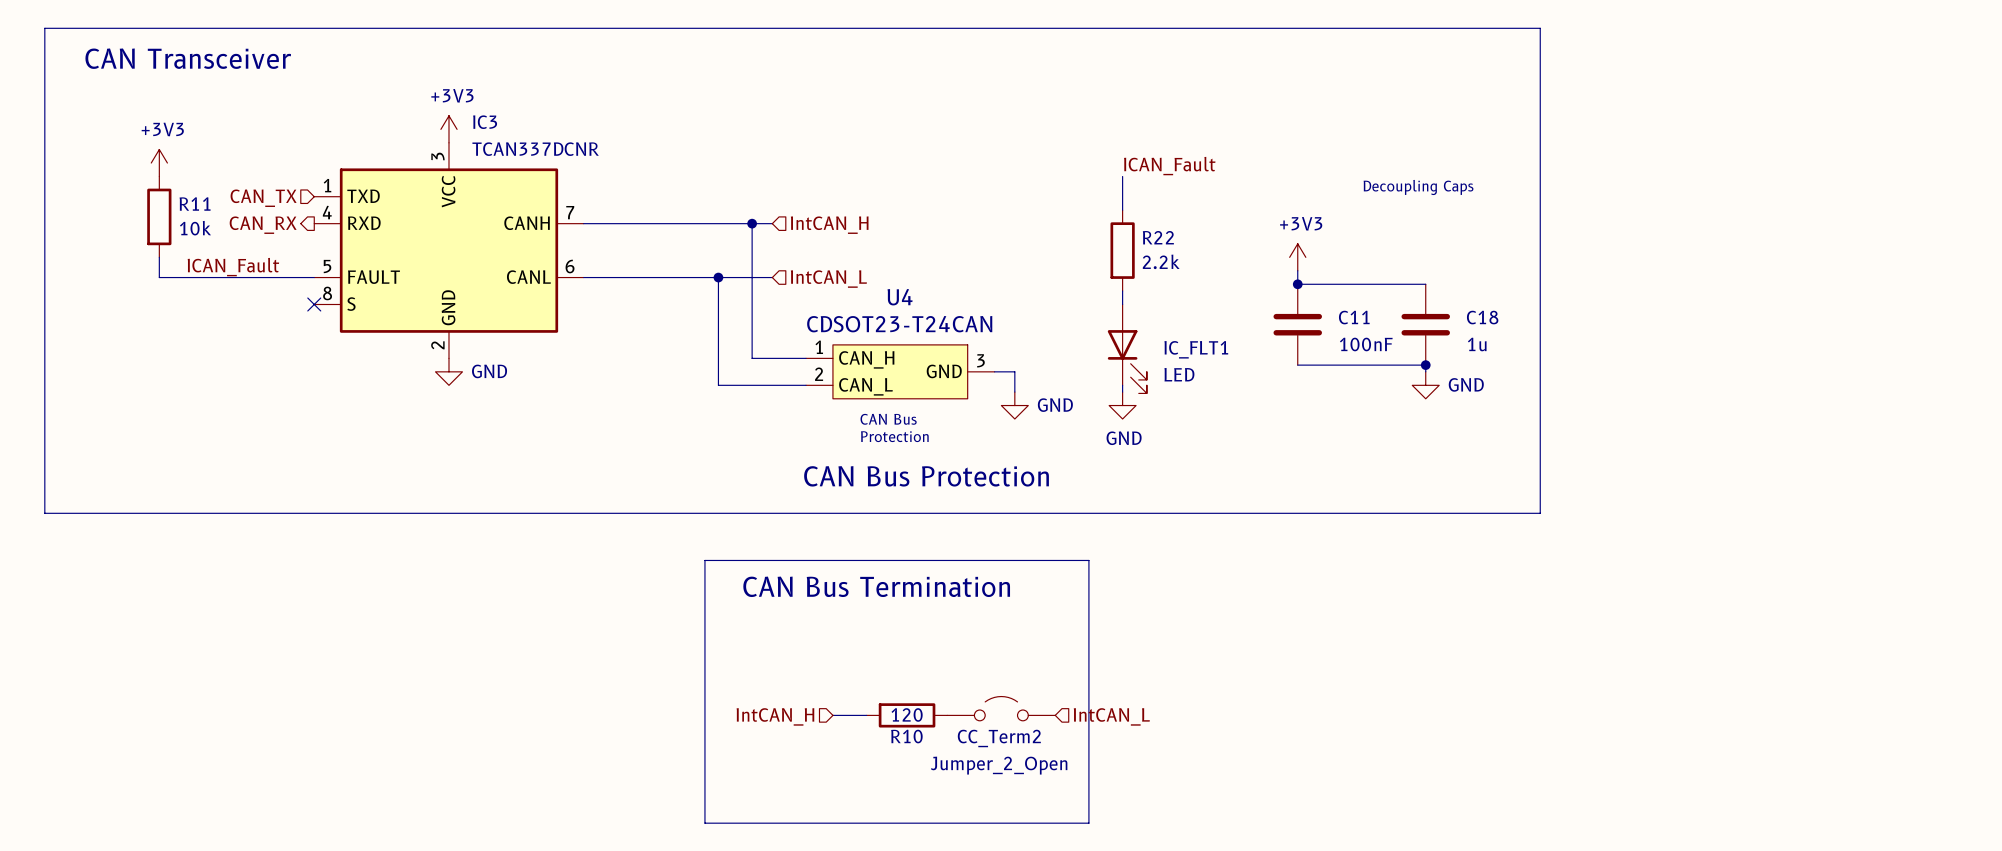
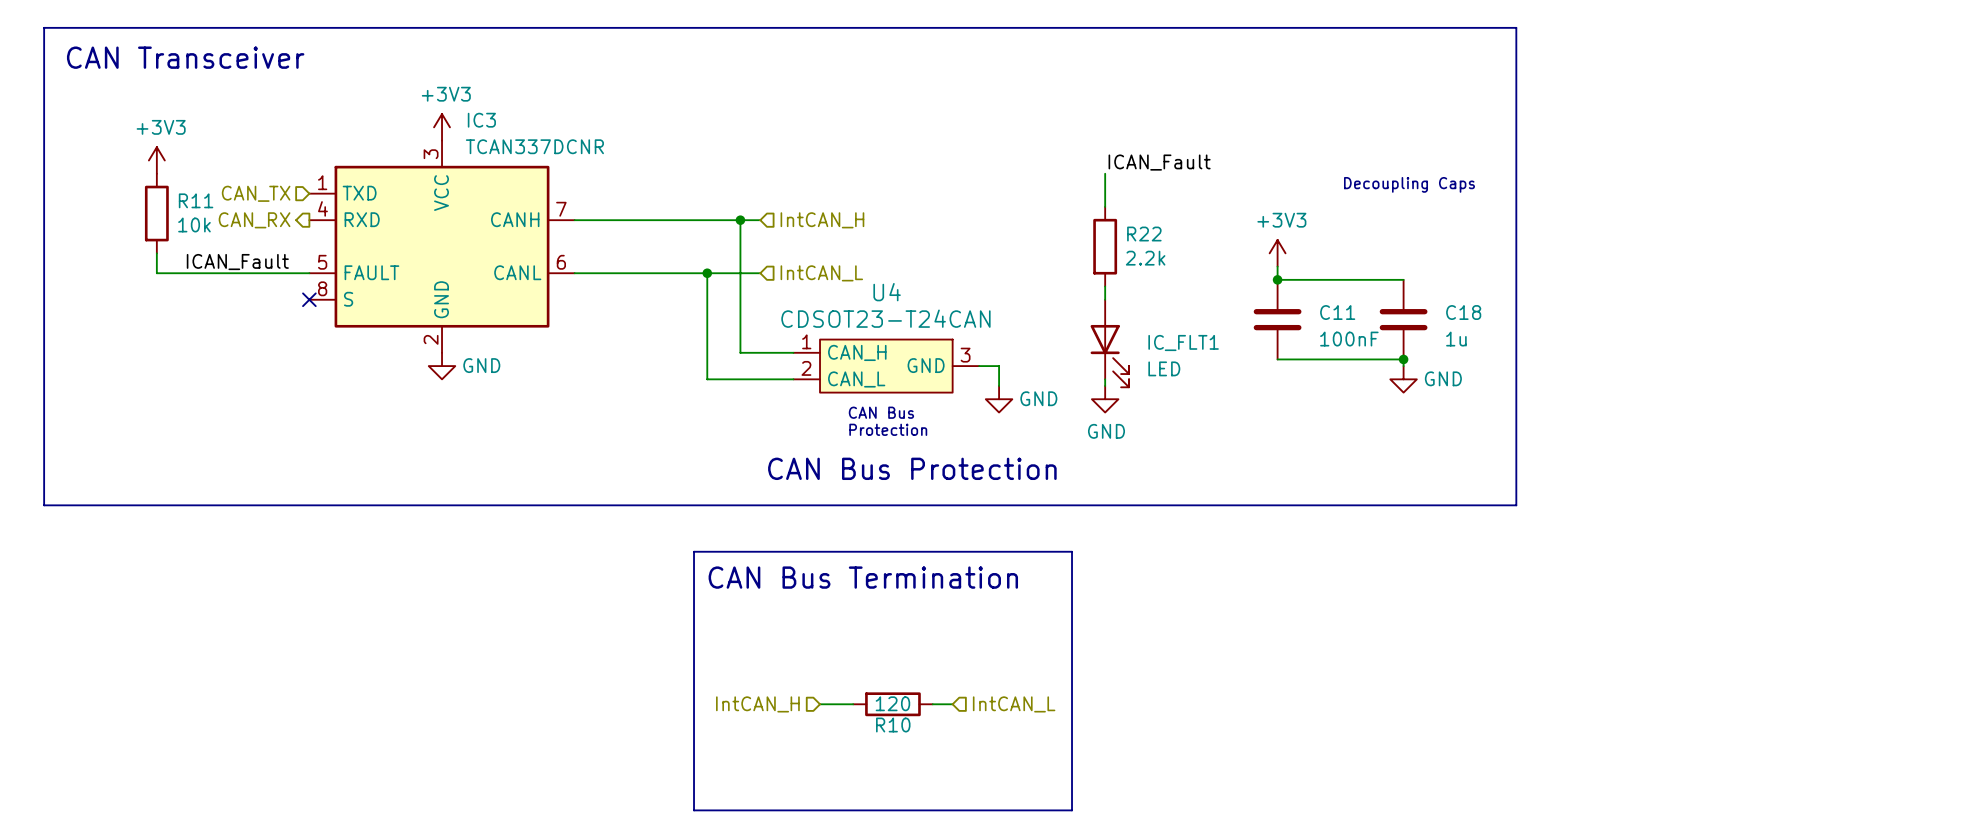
CC_Term2: Jumper_2_Open (1001, 708) -> none
hierarchical label position: IntCAN_L (1111, 716) -> IntCAN_L (1014, 704)

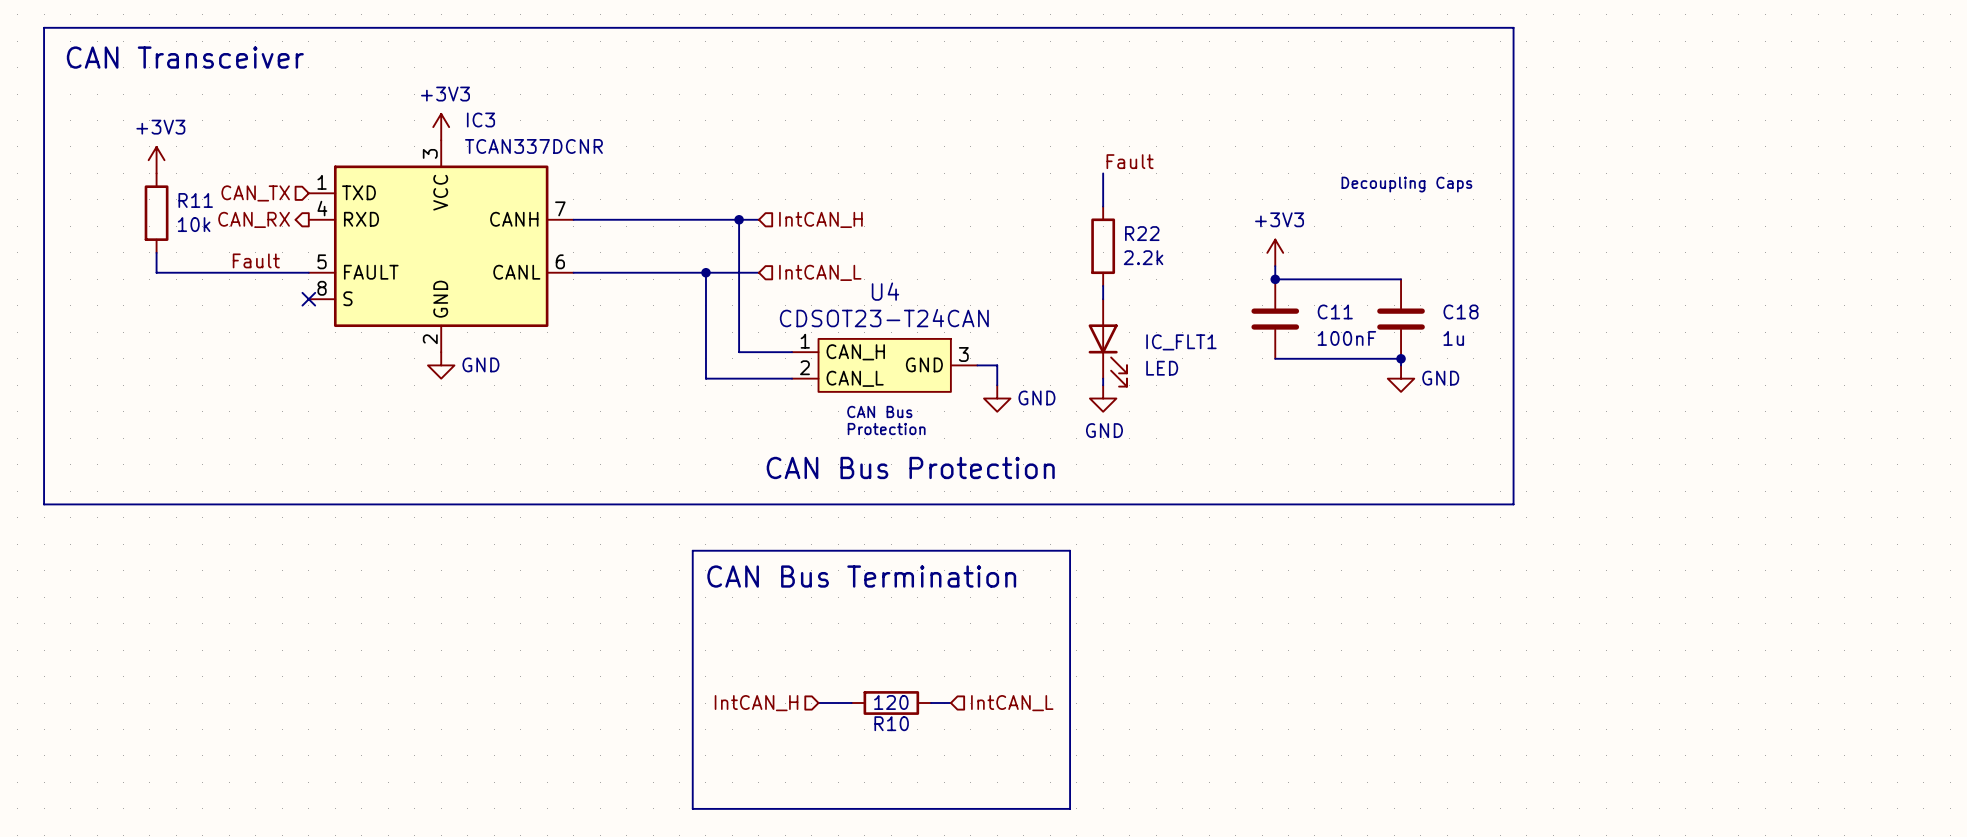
label: ICAN_Fault (1159, 162) -> Fault (1130, 161)
label: ICAN_Fault (237, 262) -> Fault (256, 260)

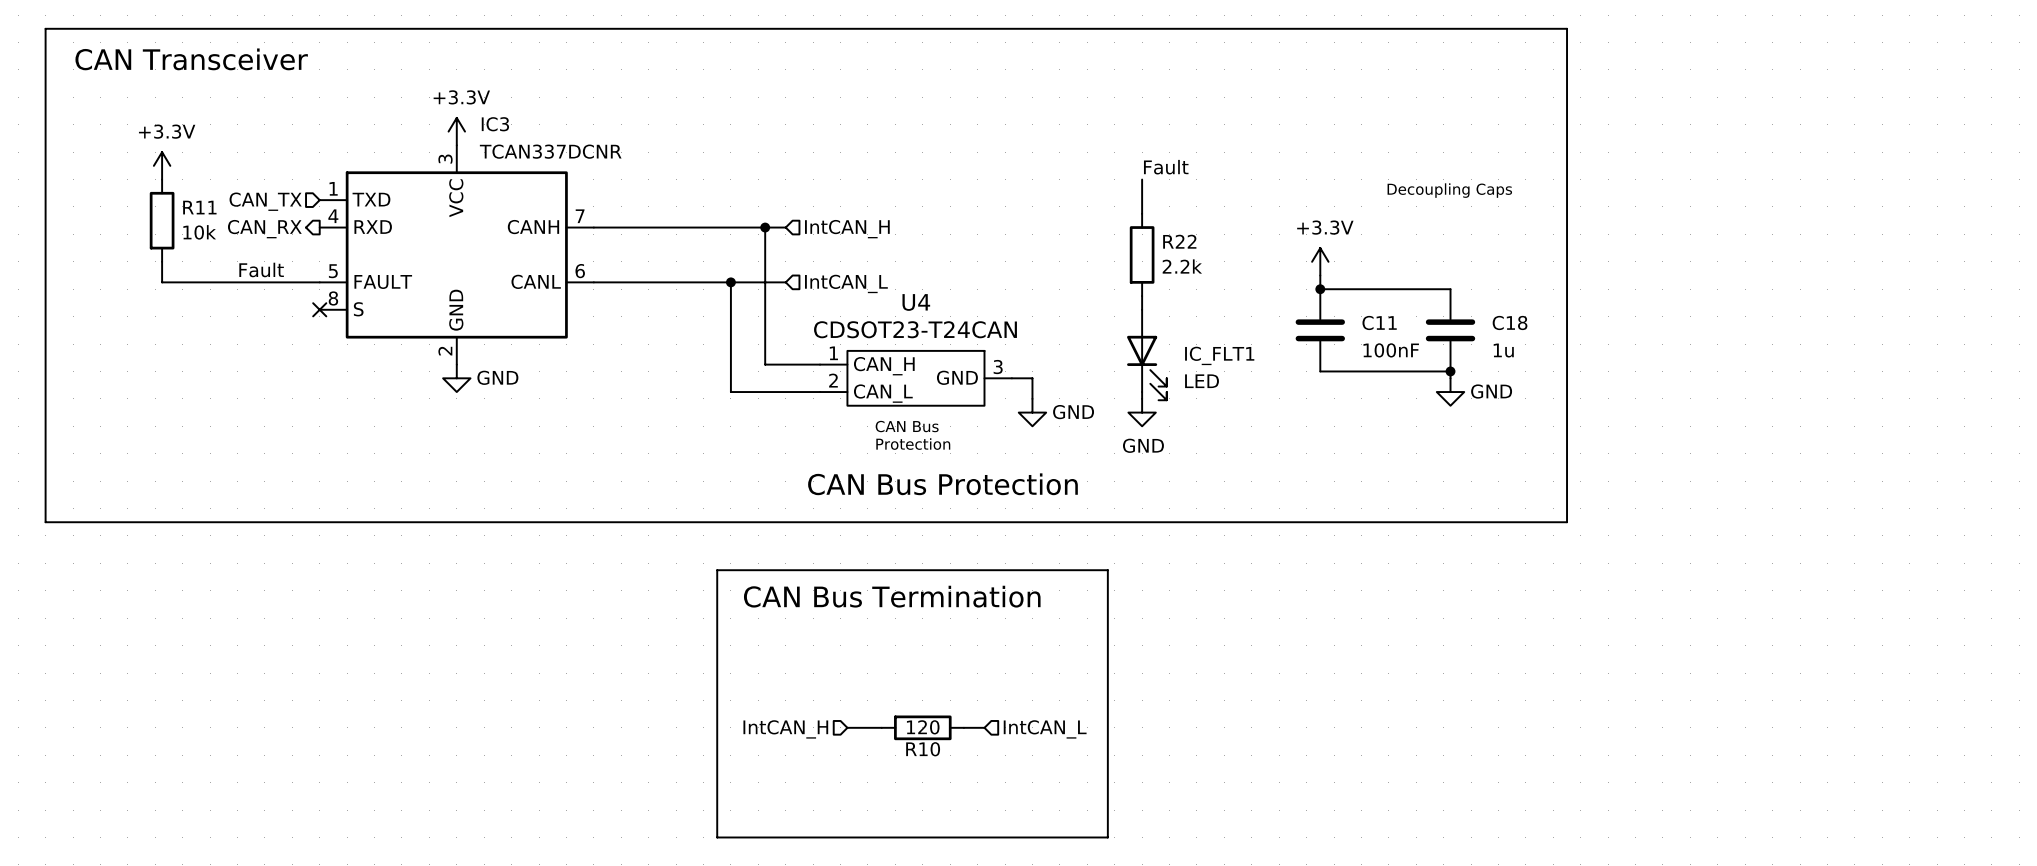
power symbol: +3V3 (441, 127) -> +3.3V (456, 131)
power symbol: +3V3 (156, 160) -> +3.3V (162, 165)
power symbol: +3V3 (1275, 252) -> +3.3V (1320, 261)

